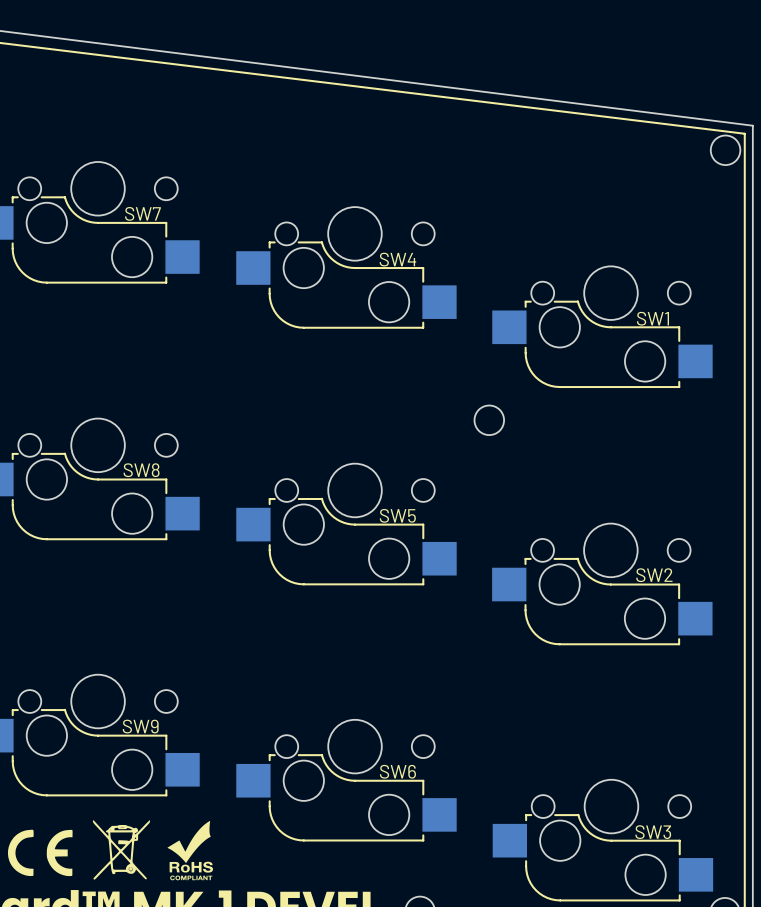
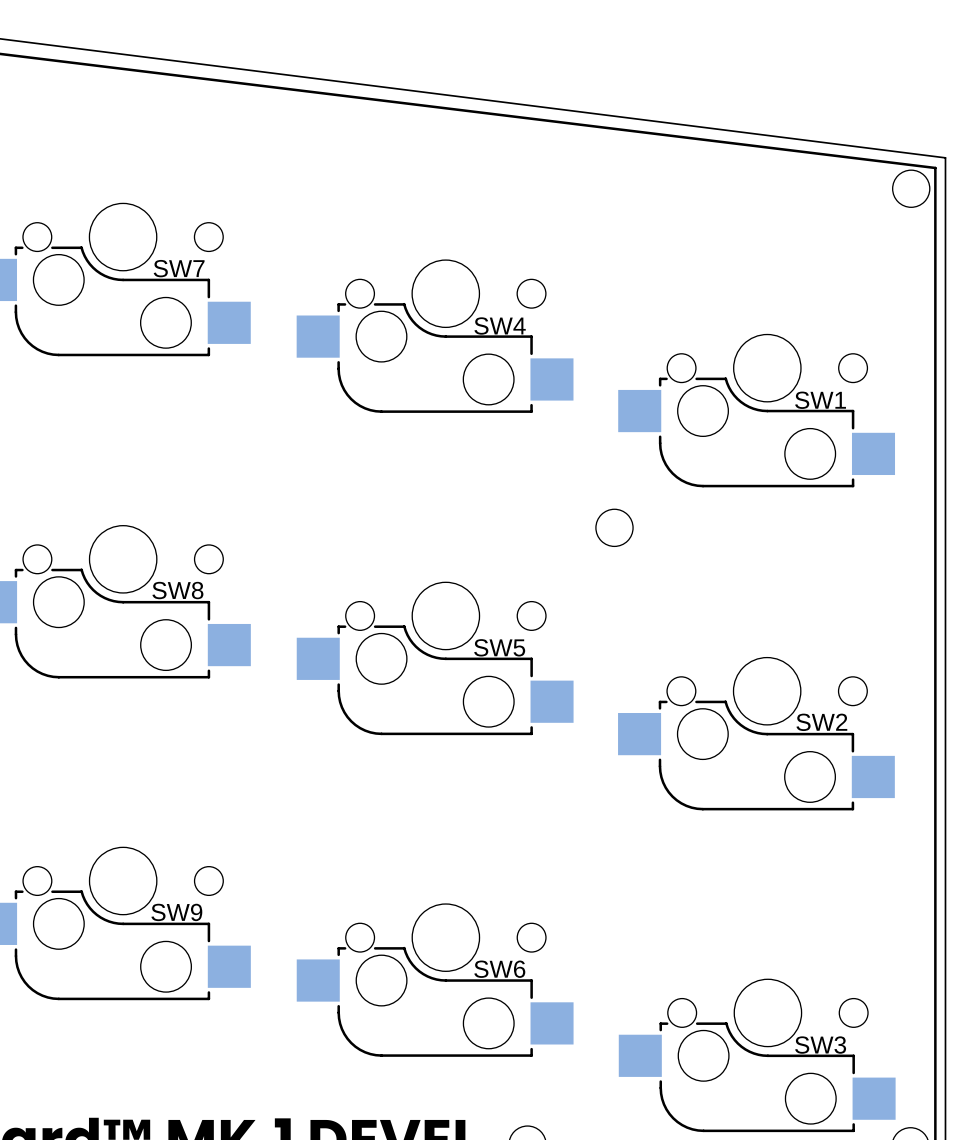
drawing: [92, 820, 151, 880] -> none
drawing: [167, 820, 214, 881] -> none
drawing: [7, 829, 73, 877] -> none

